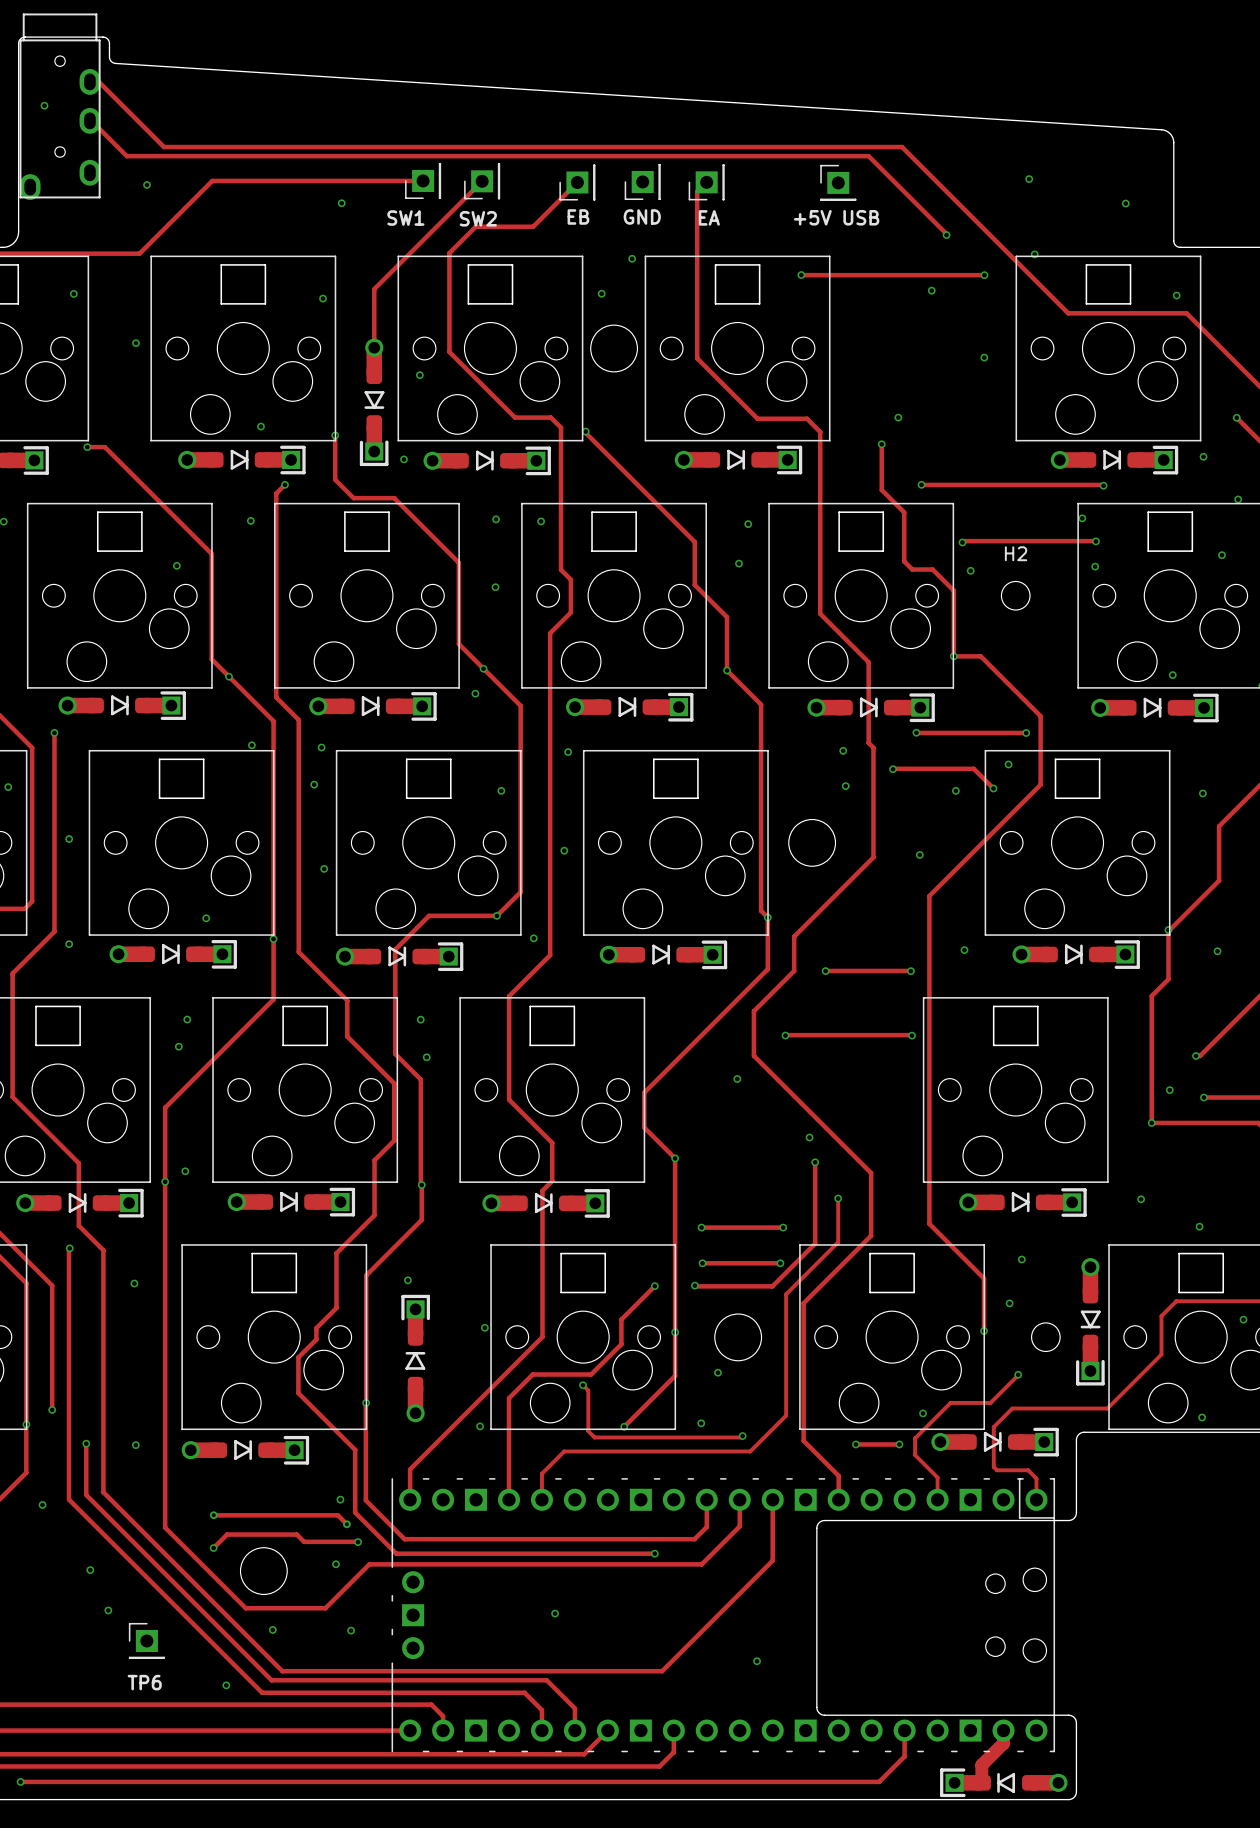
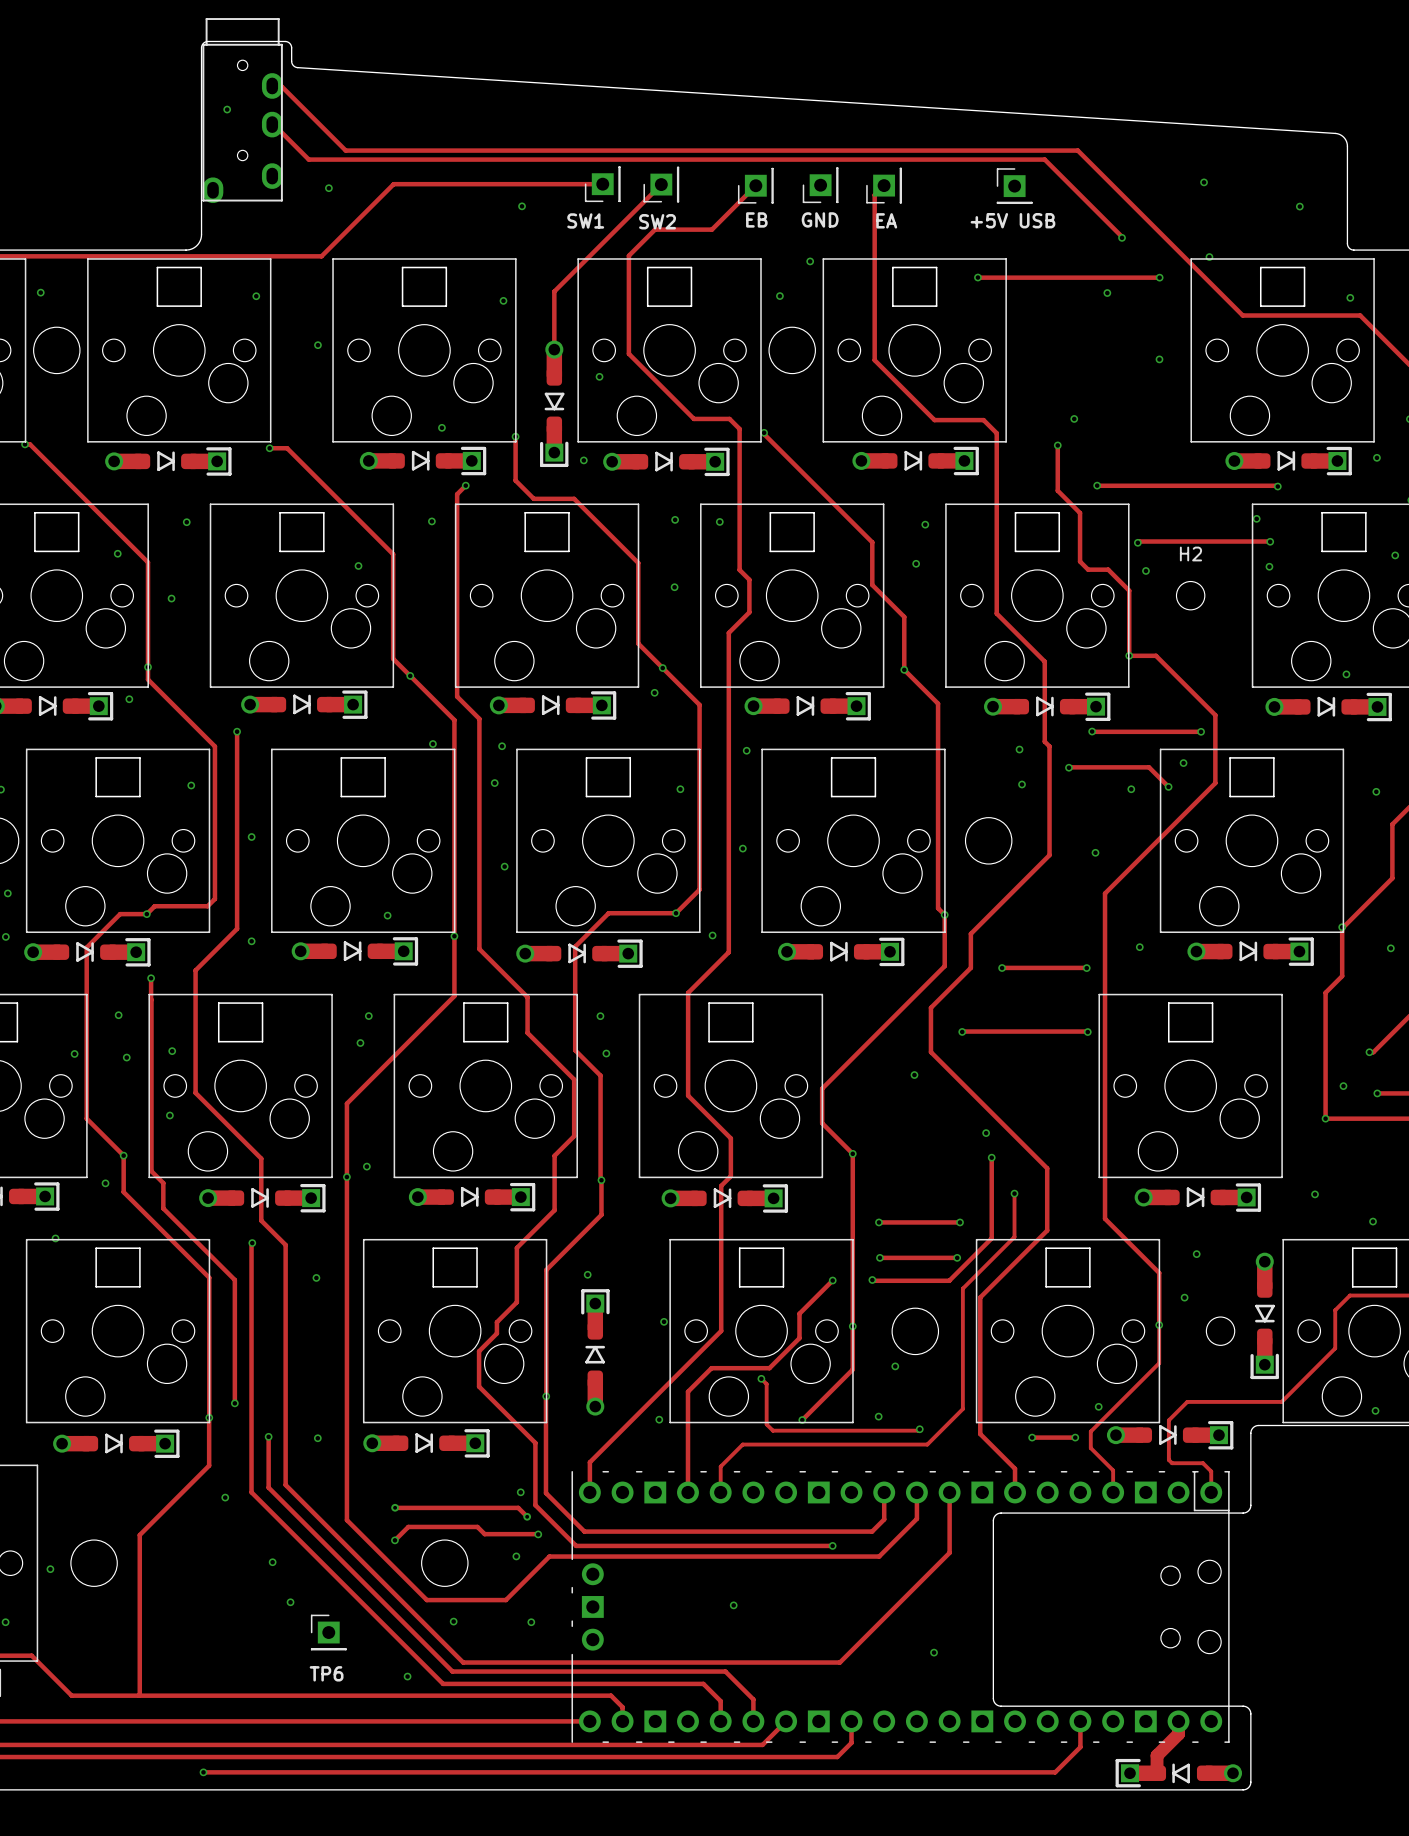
track: (1018, 1374) (990, 1402) (950, 1402) -> (1159, 1325) (1159, 1363) (1126, 1396)
via: (1018, 1374) -> none

